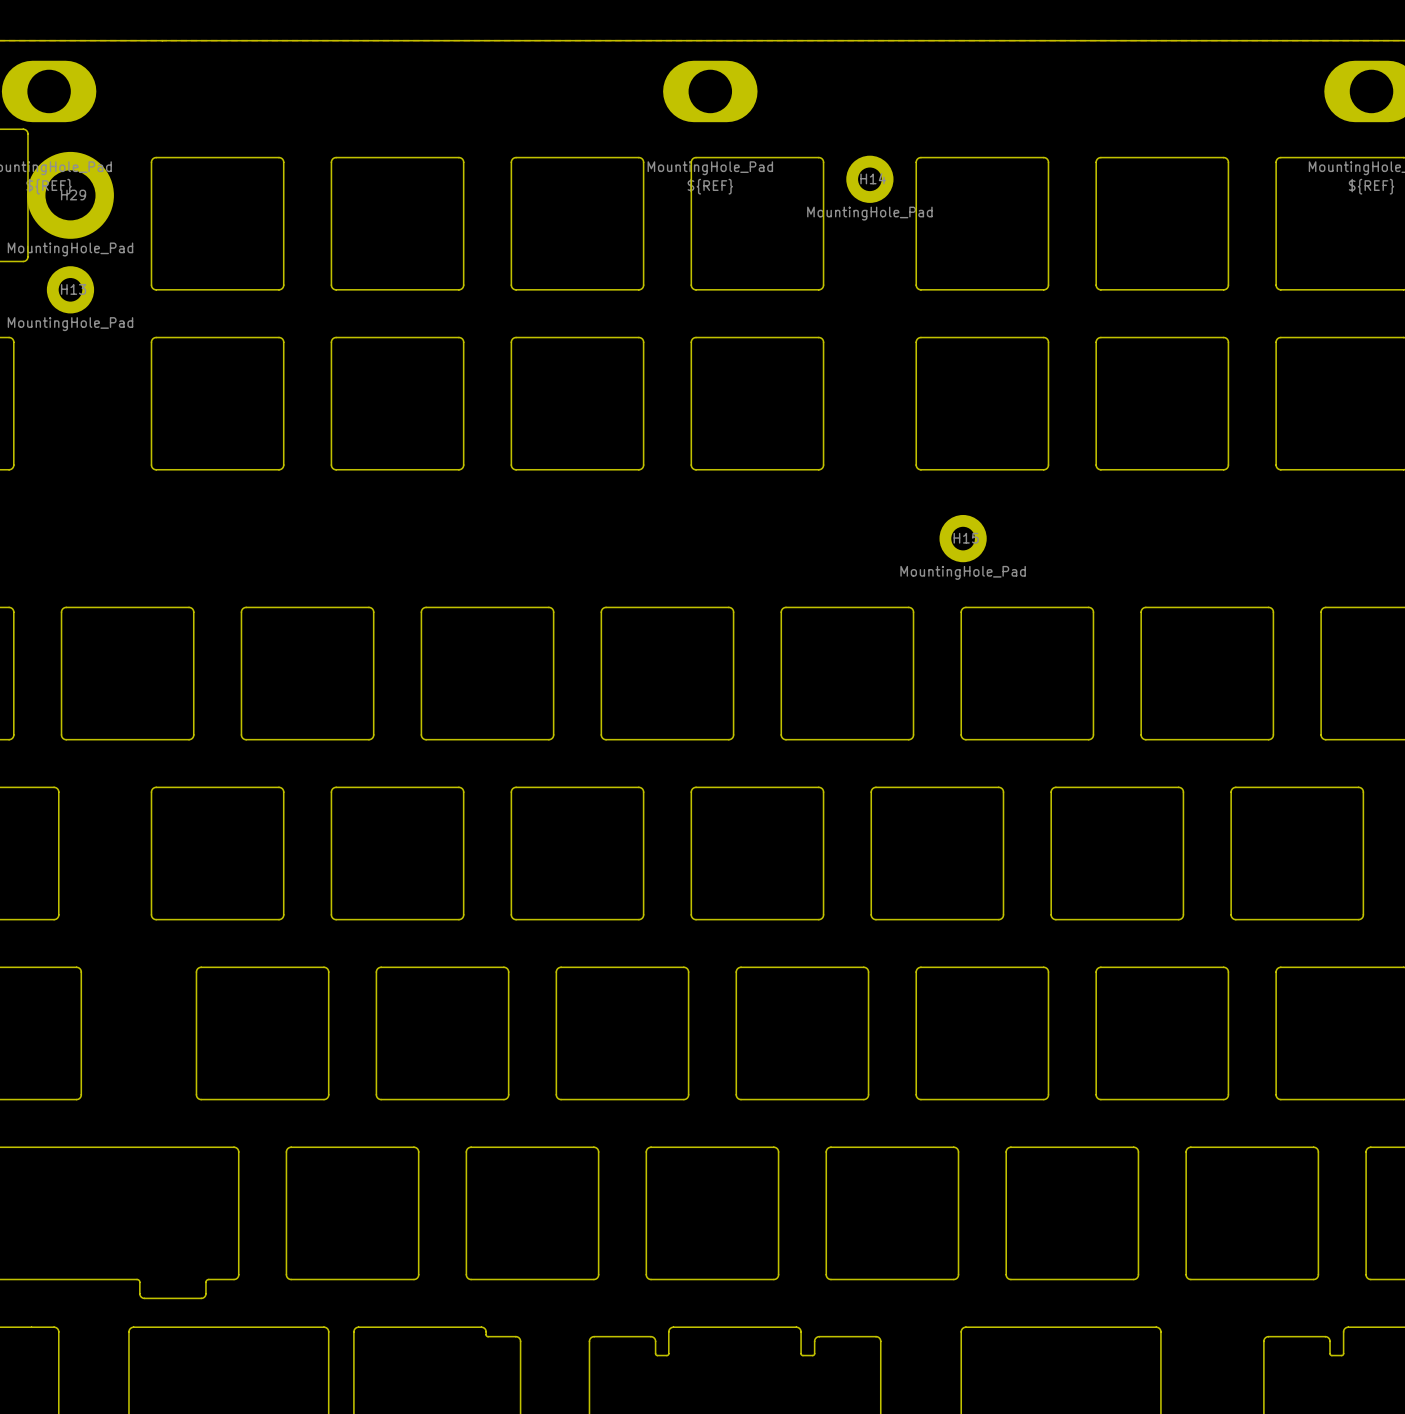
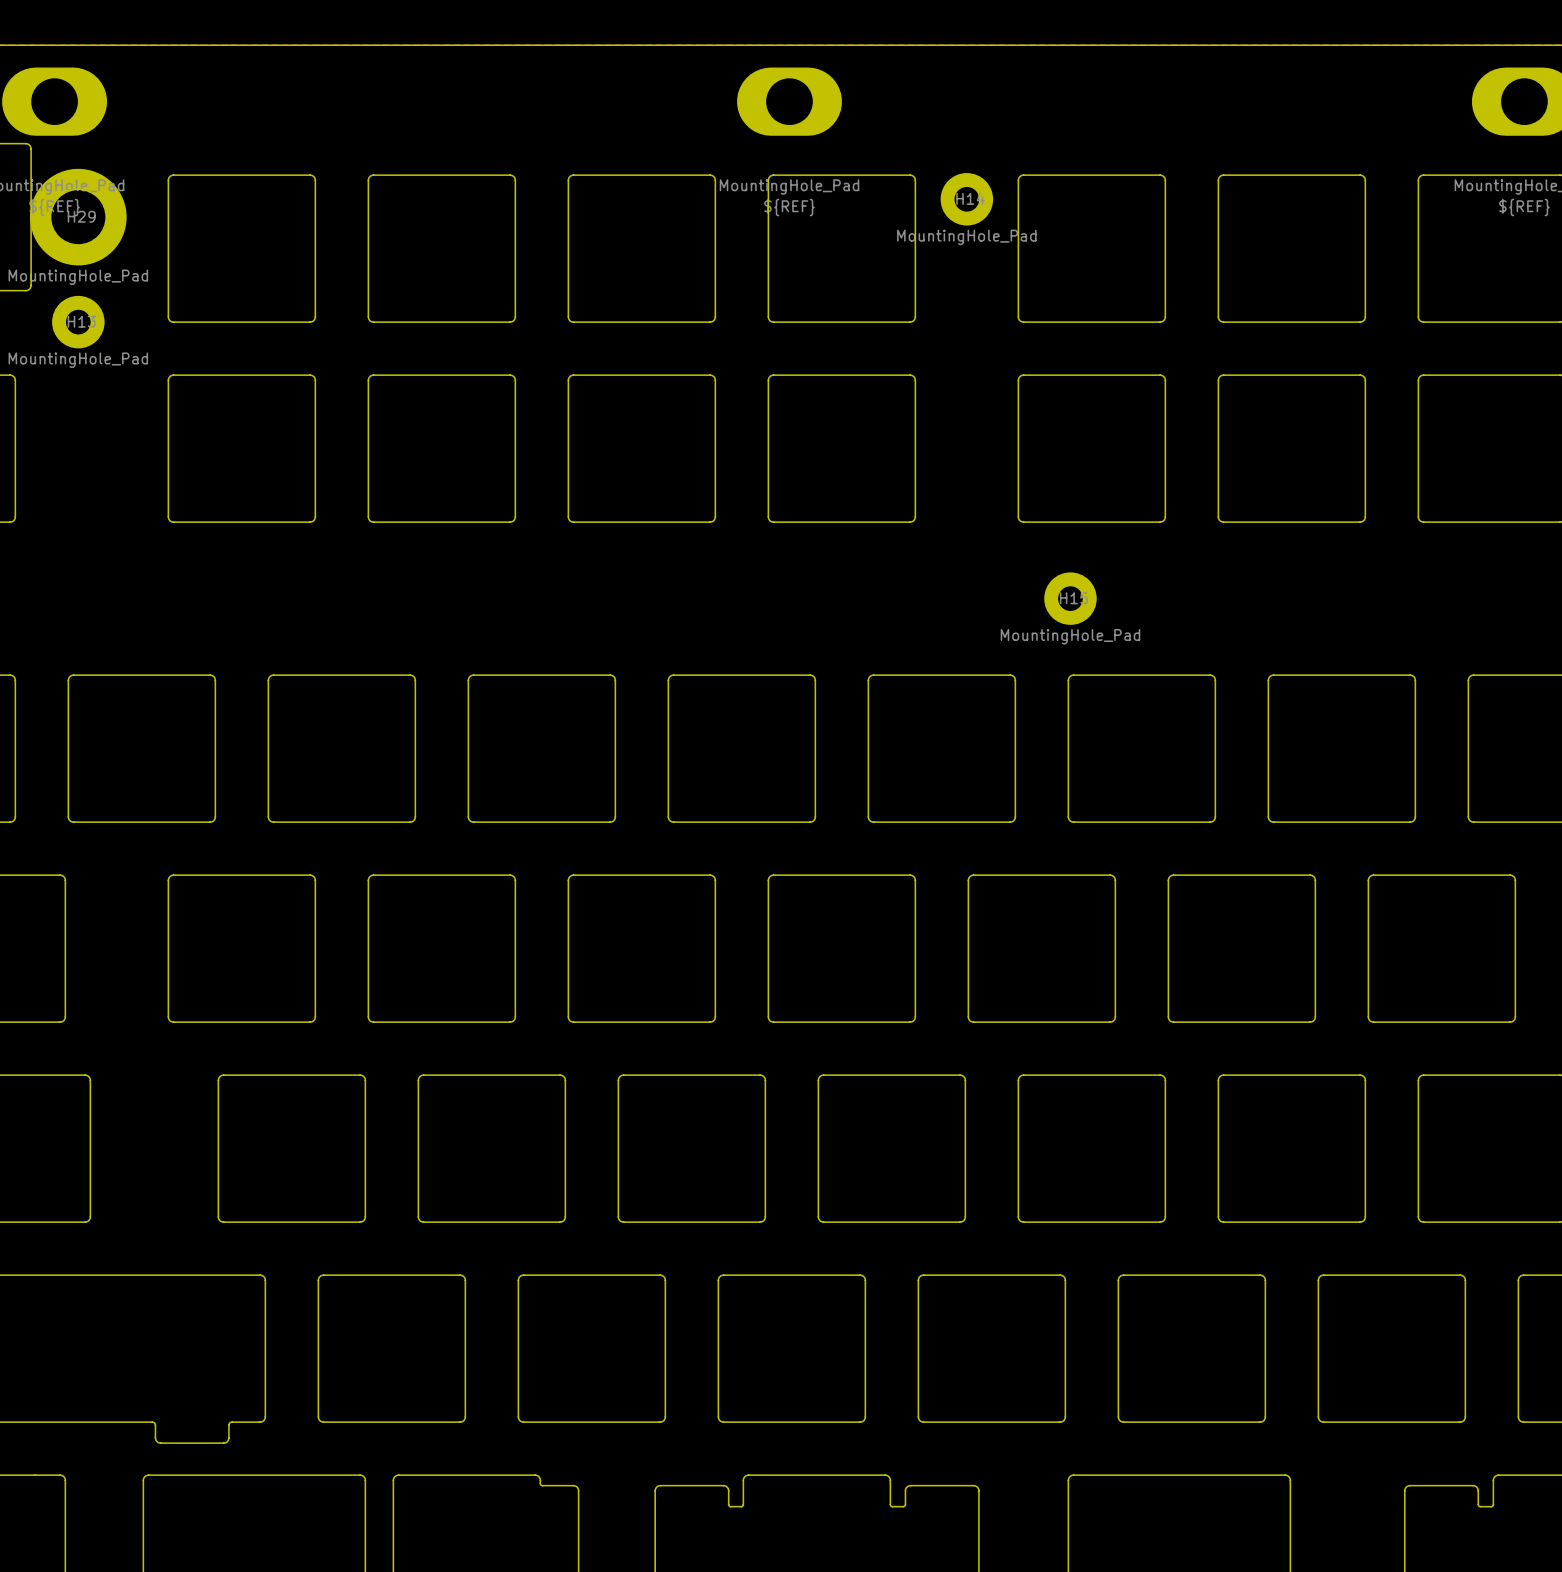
round board edge: none -> [29, 76, 80, 127]
round board edge: none -> [764, 76, 815, 127]
round board edge: none -> [1499, 76, 1550, 127]
round board edge: none -> [953, 185, 981, 213]
round board edge: none -> [49, 188, 107, 246]
round board edge: none -> [64, 308, 92, 336]
round board edge: none -> [1056, 584, 1085, 613]

